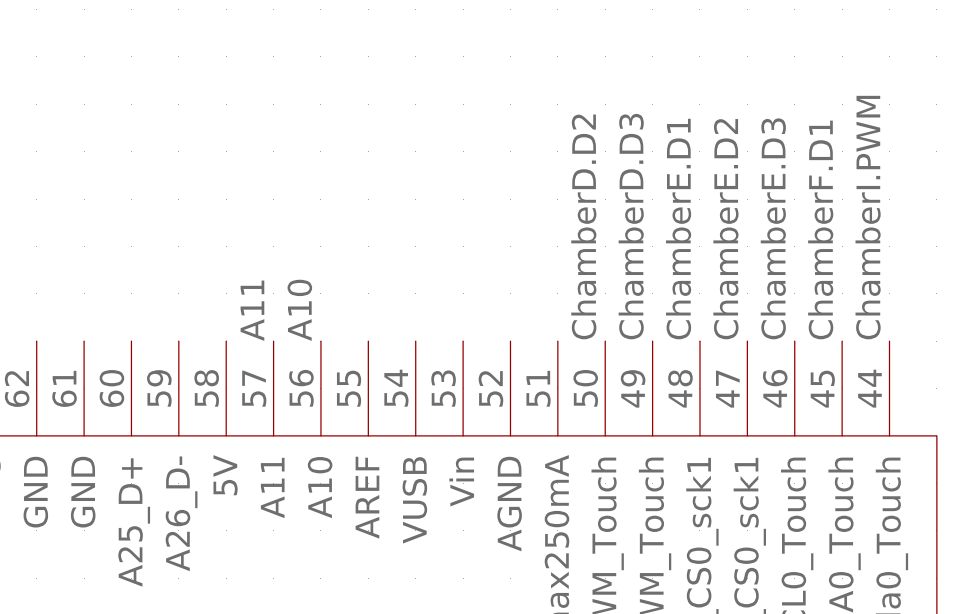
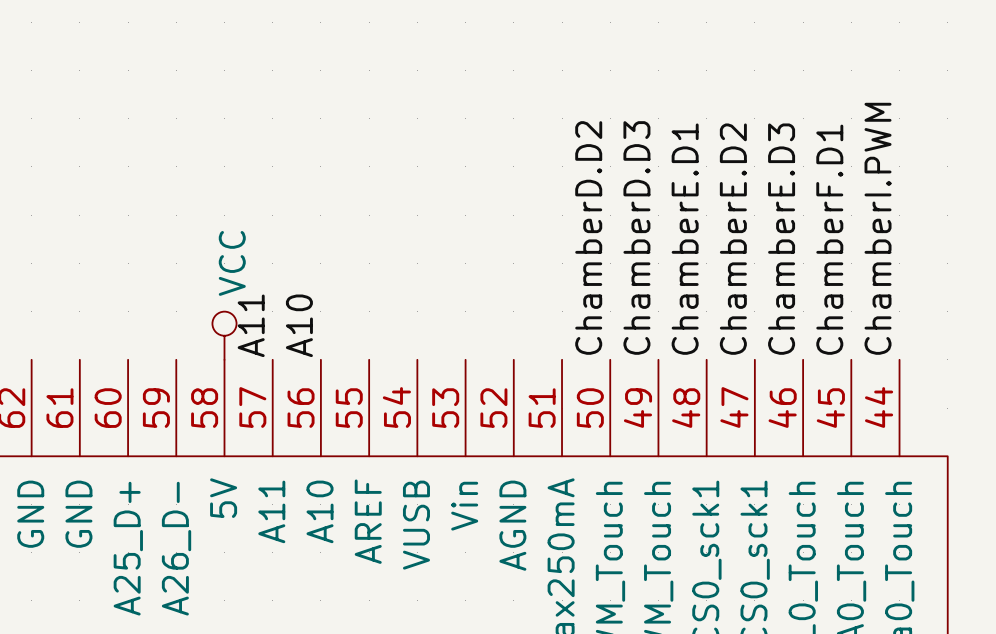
power symbol: none -> VCC (224, 335)

